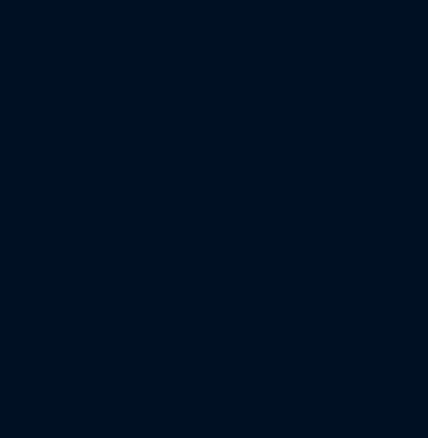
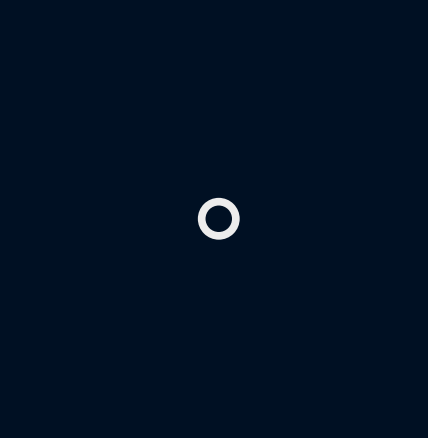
via: none -> (218, 218)

